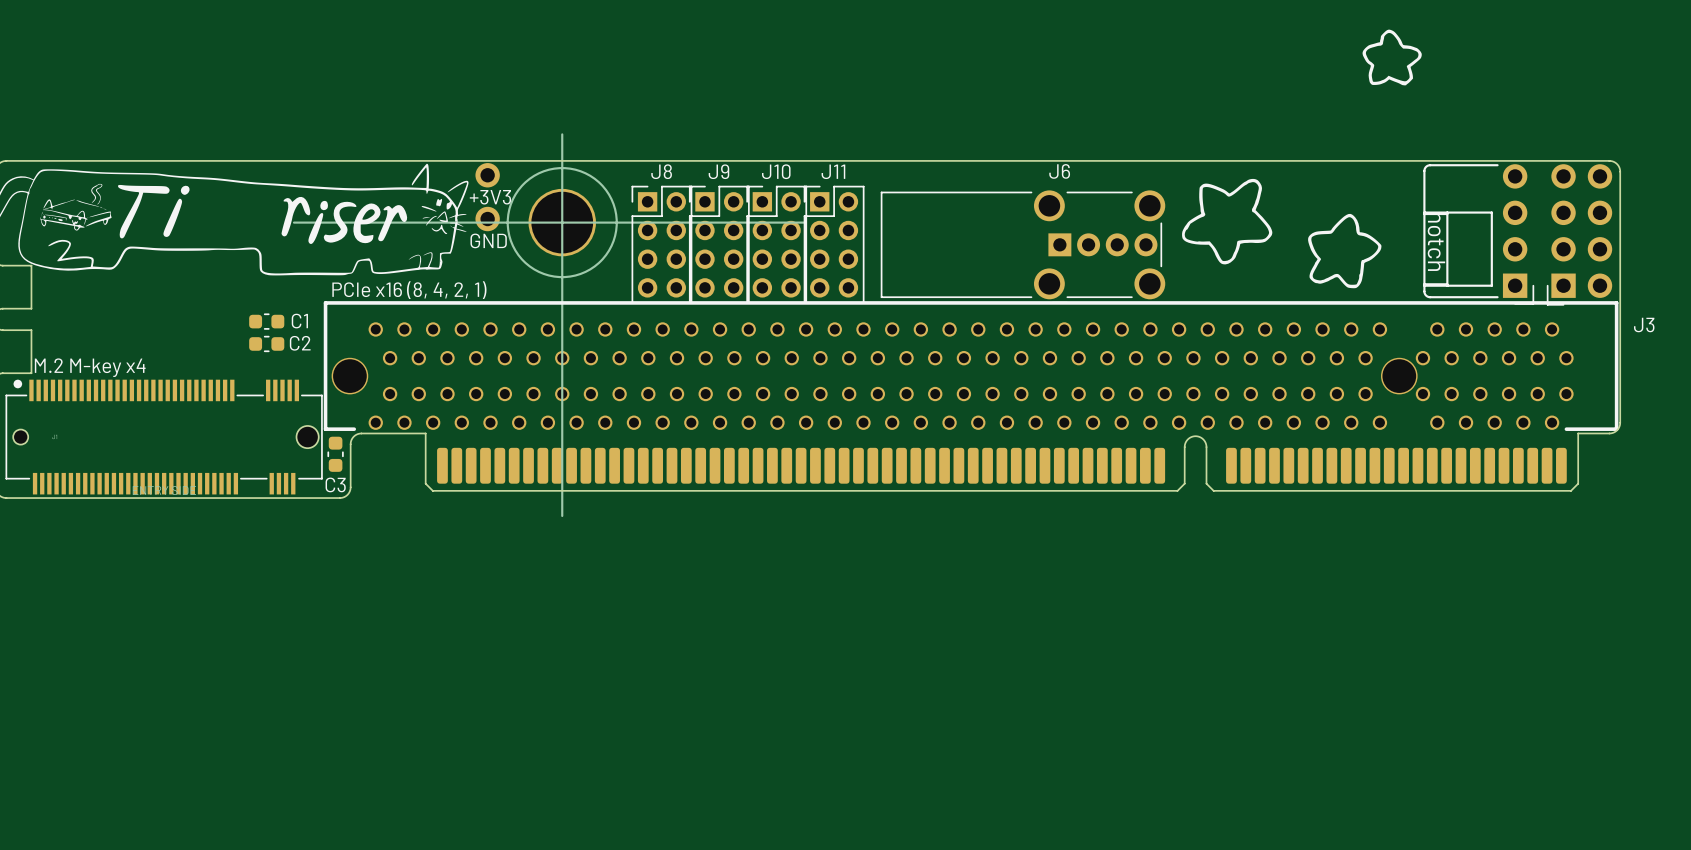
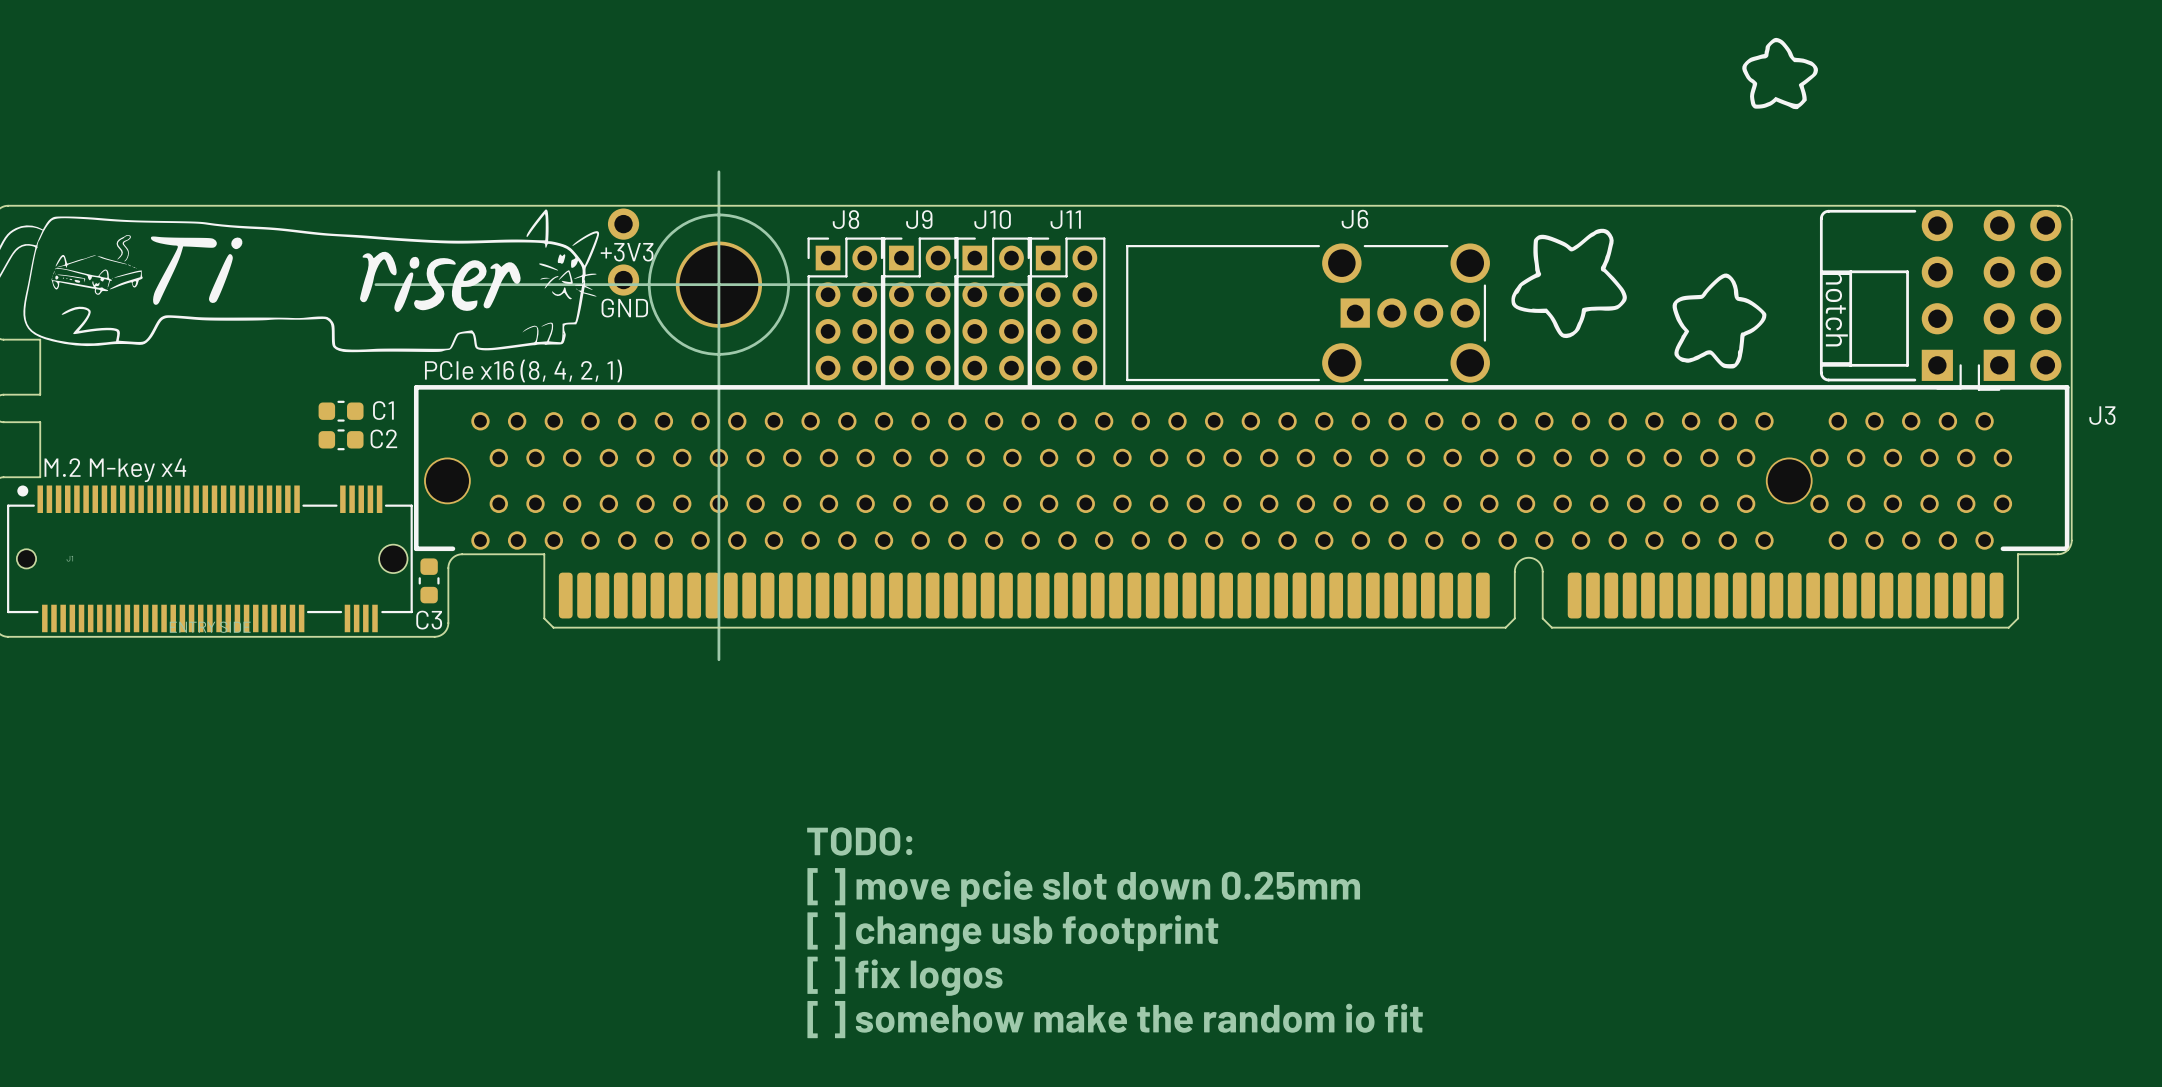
text: none -> TODO: (859, 841)
text: none -> [ ] move pcie slot down 0.25mm (1083, 887)
text: none -> [ ] change usb footprint (1012, 931)
text: none -> [ ] fix logos (904, 976)
text: none -> [ ] somehow make the random io fit (1115, 1019)

